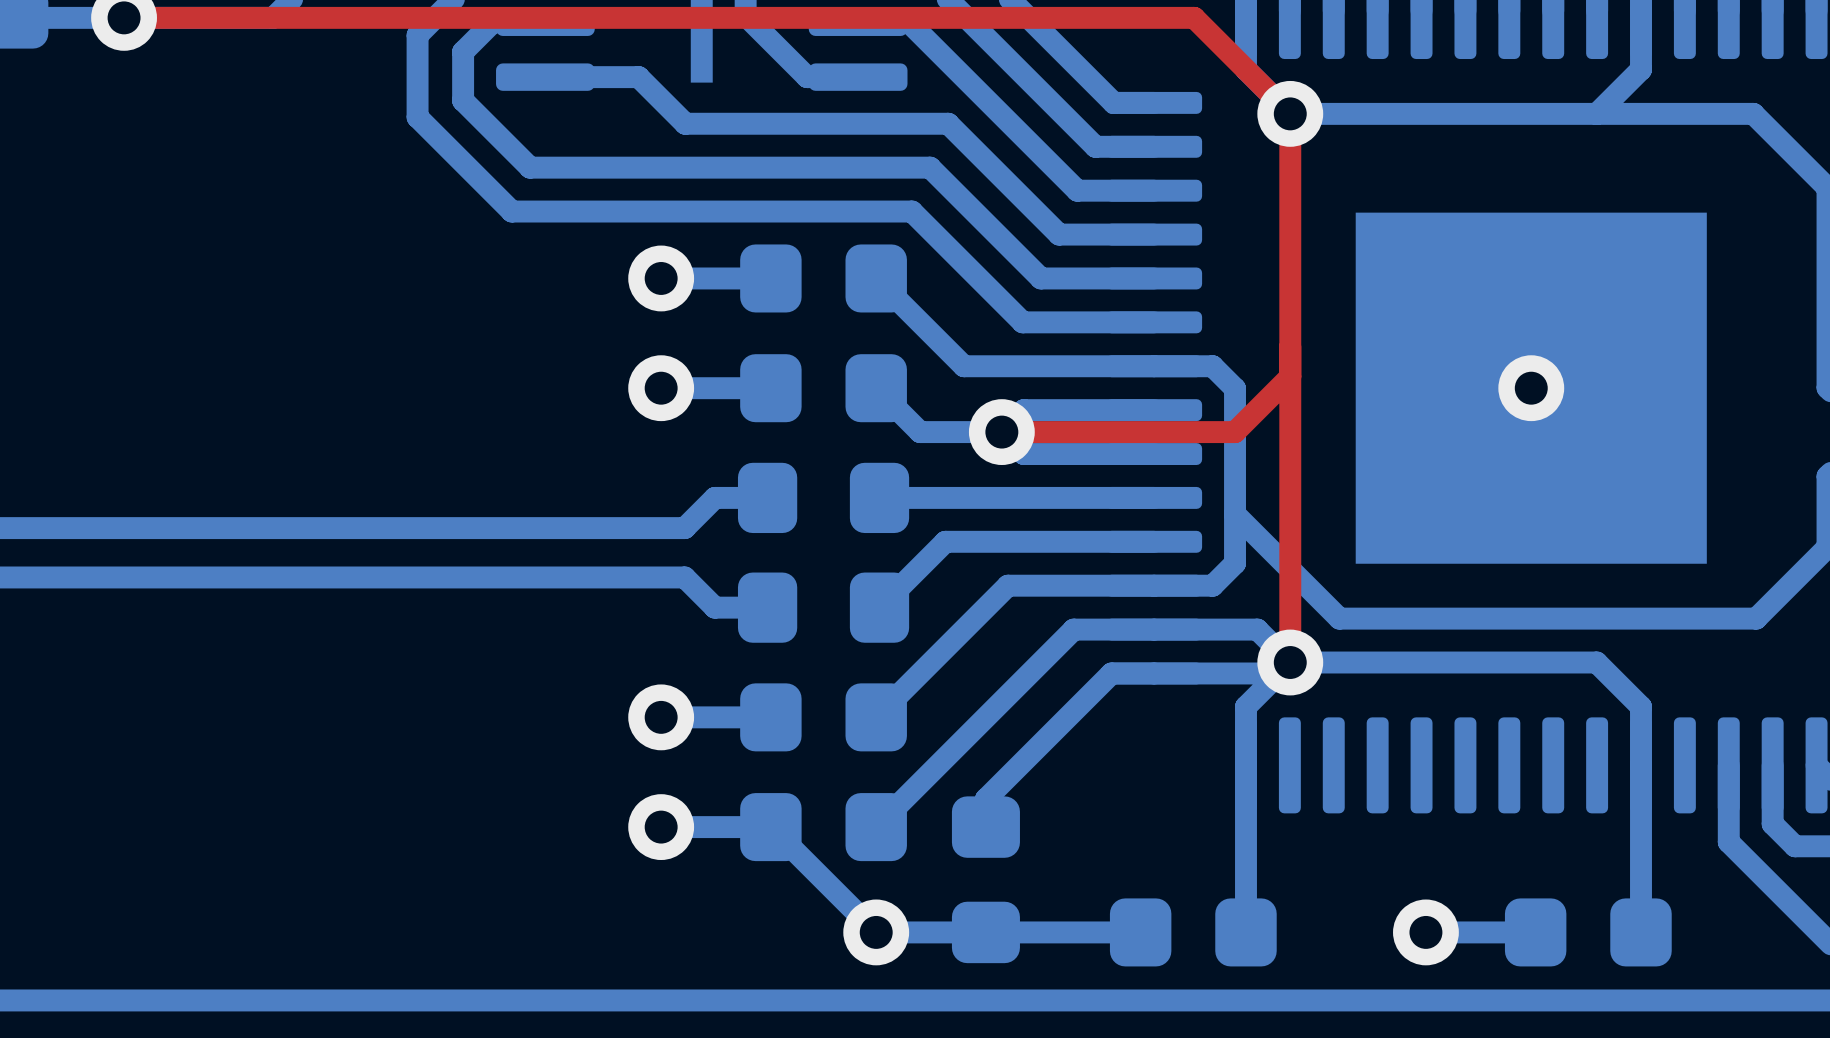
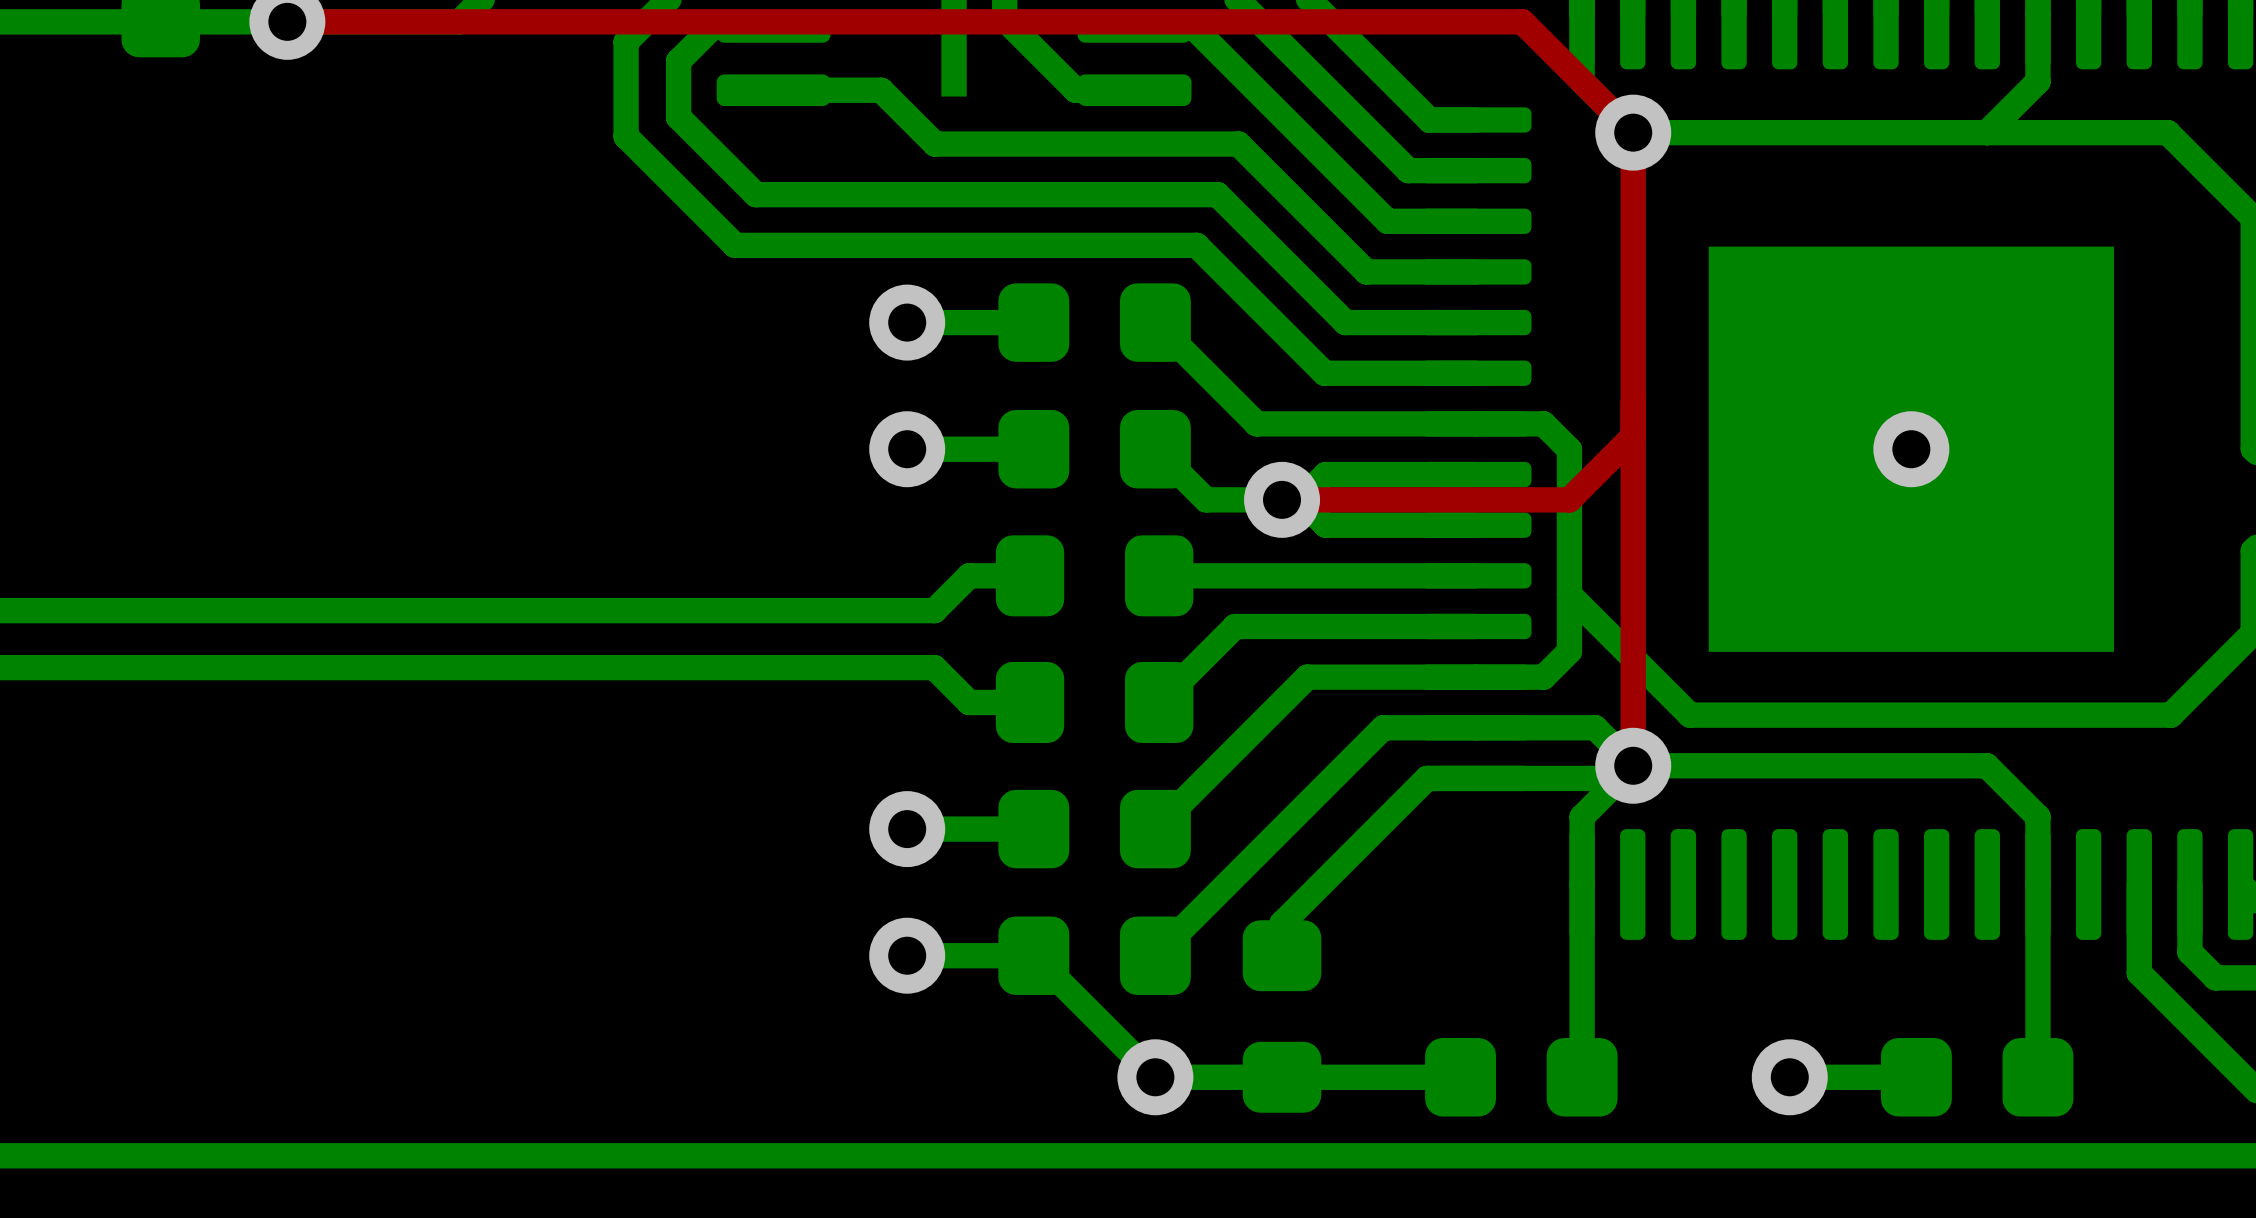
via position: (1001, 432) -> (1282, 499)

